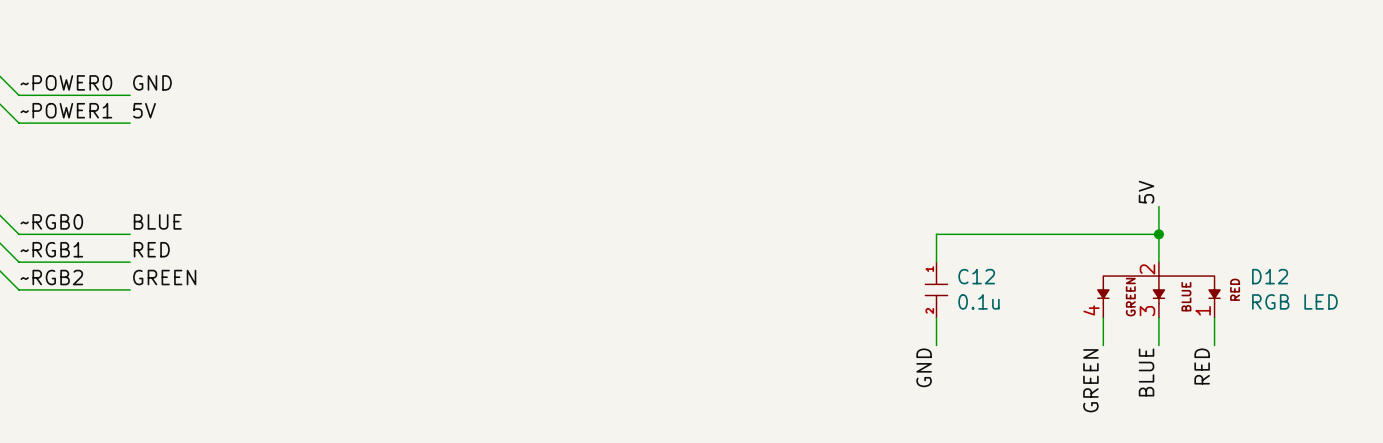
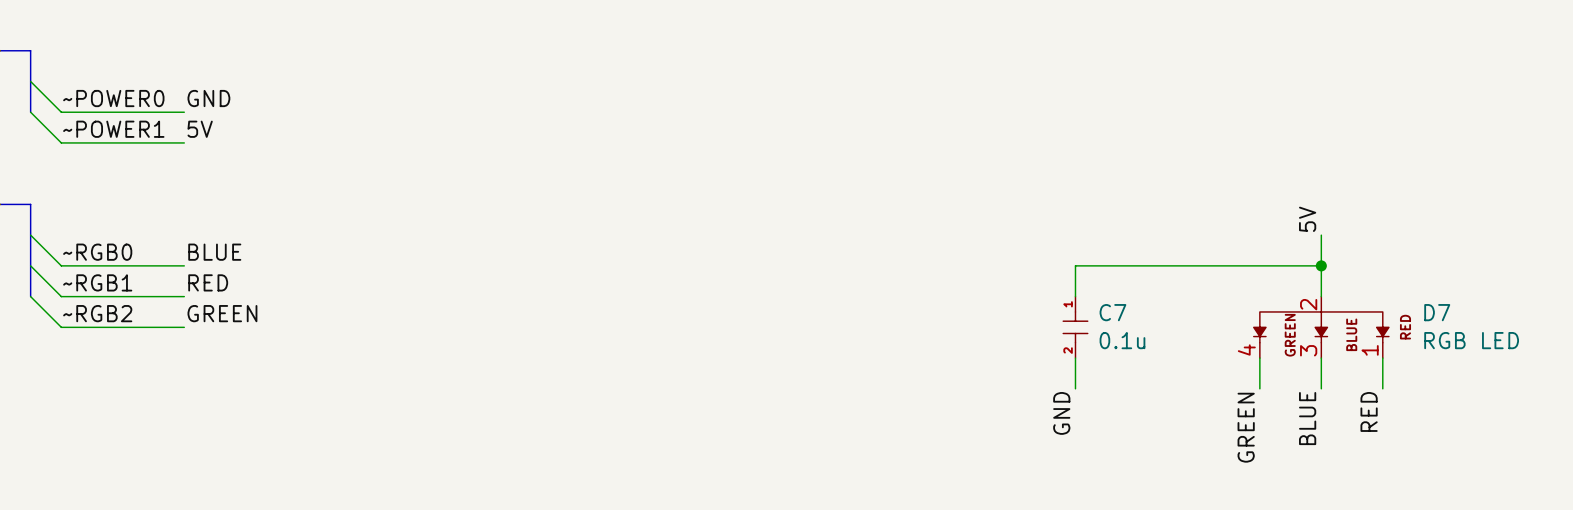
C12 name: C12 (976, 276) -> C7 (1112, 312)
D12 name: D12 (1270, 276) -> D7 (1437, 312)

